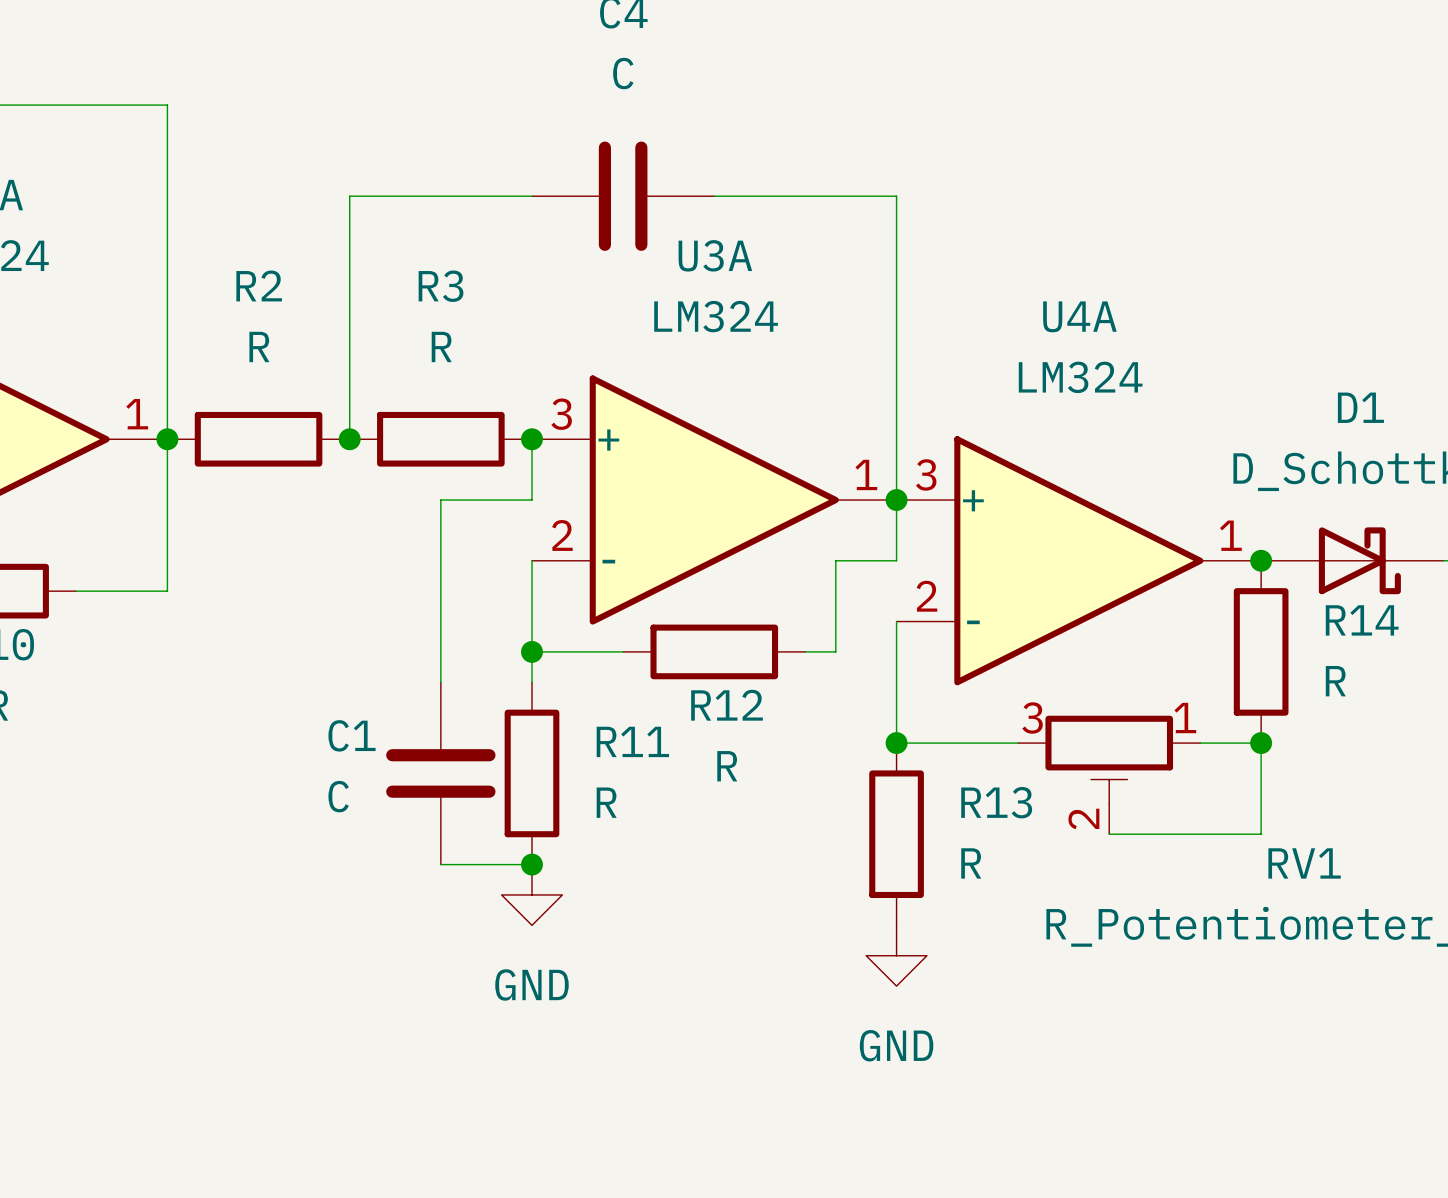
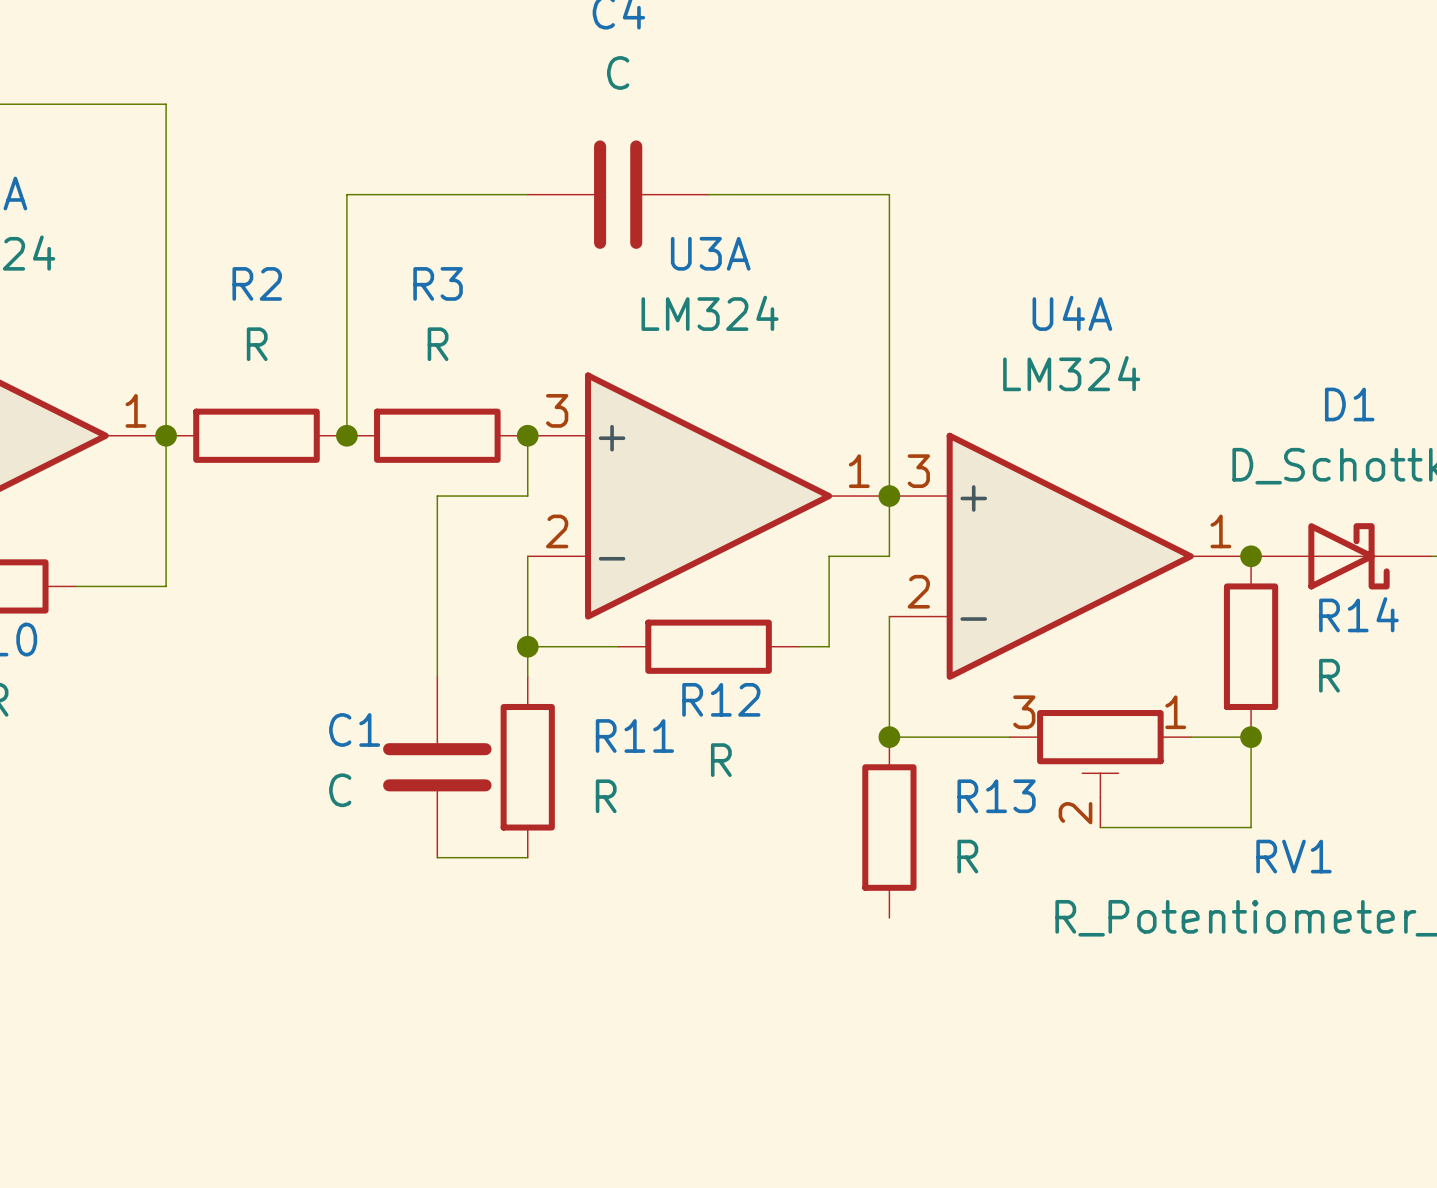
junction: (531, 864) -> none
power symbol: GND (531, 894) -> none
power symbol: GND (896, 955) -> none

